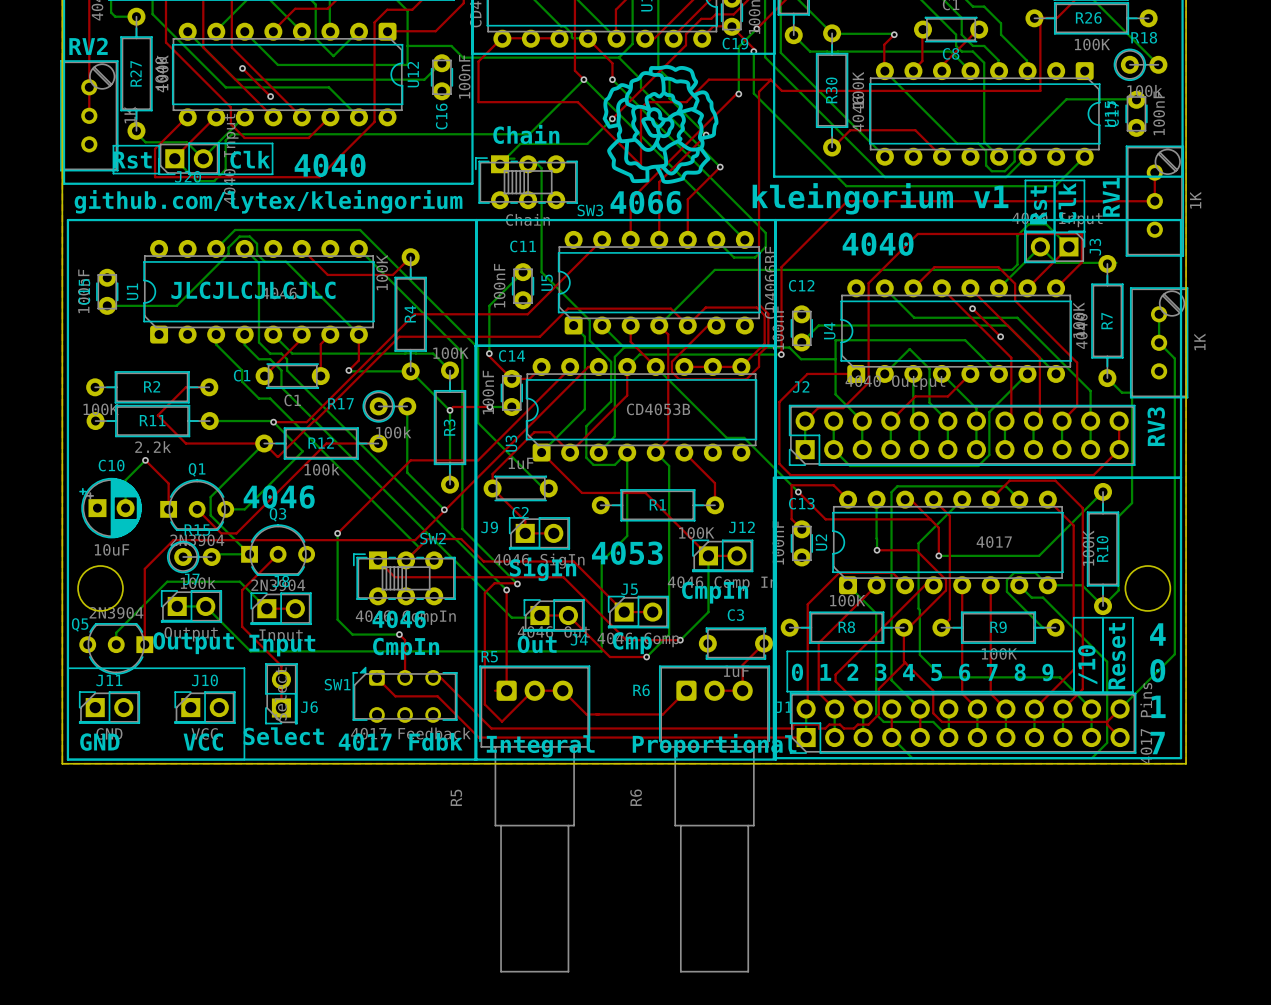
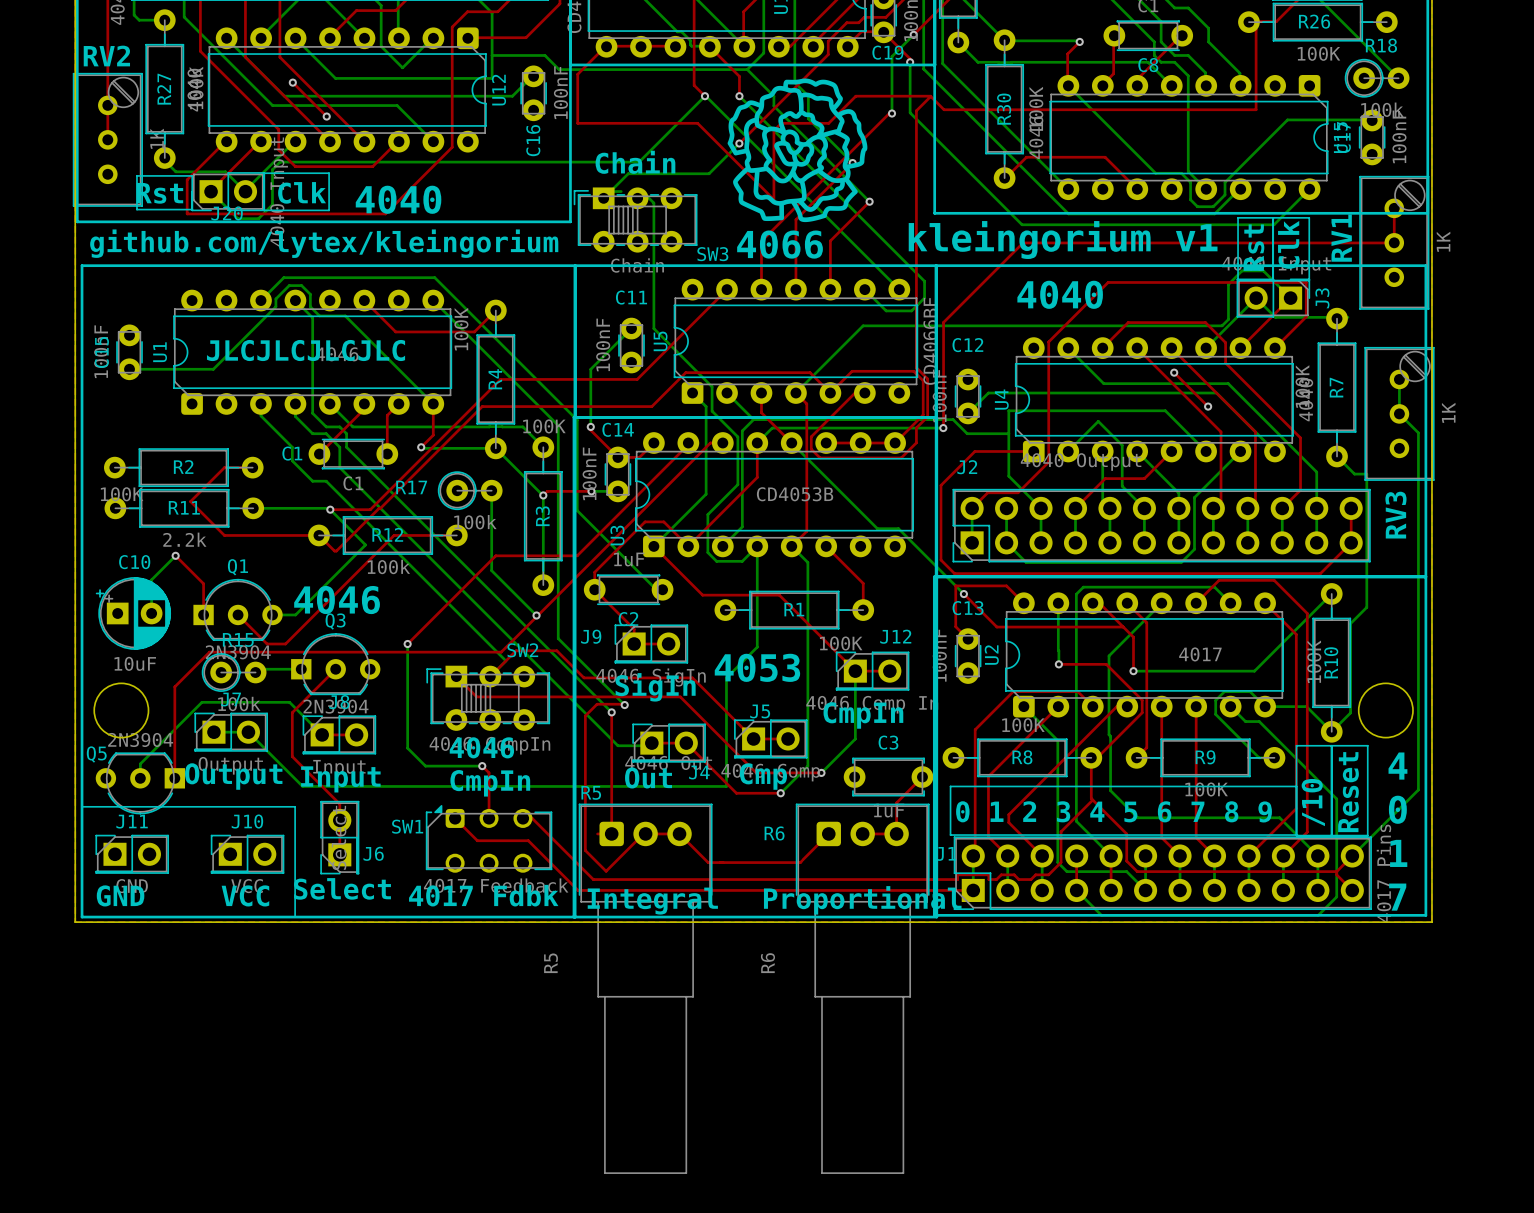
bottom track: (264, 443) (210, 497) (210, 515) (249, 554) -> none

